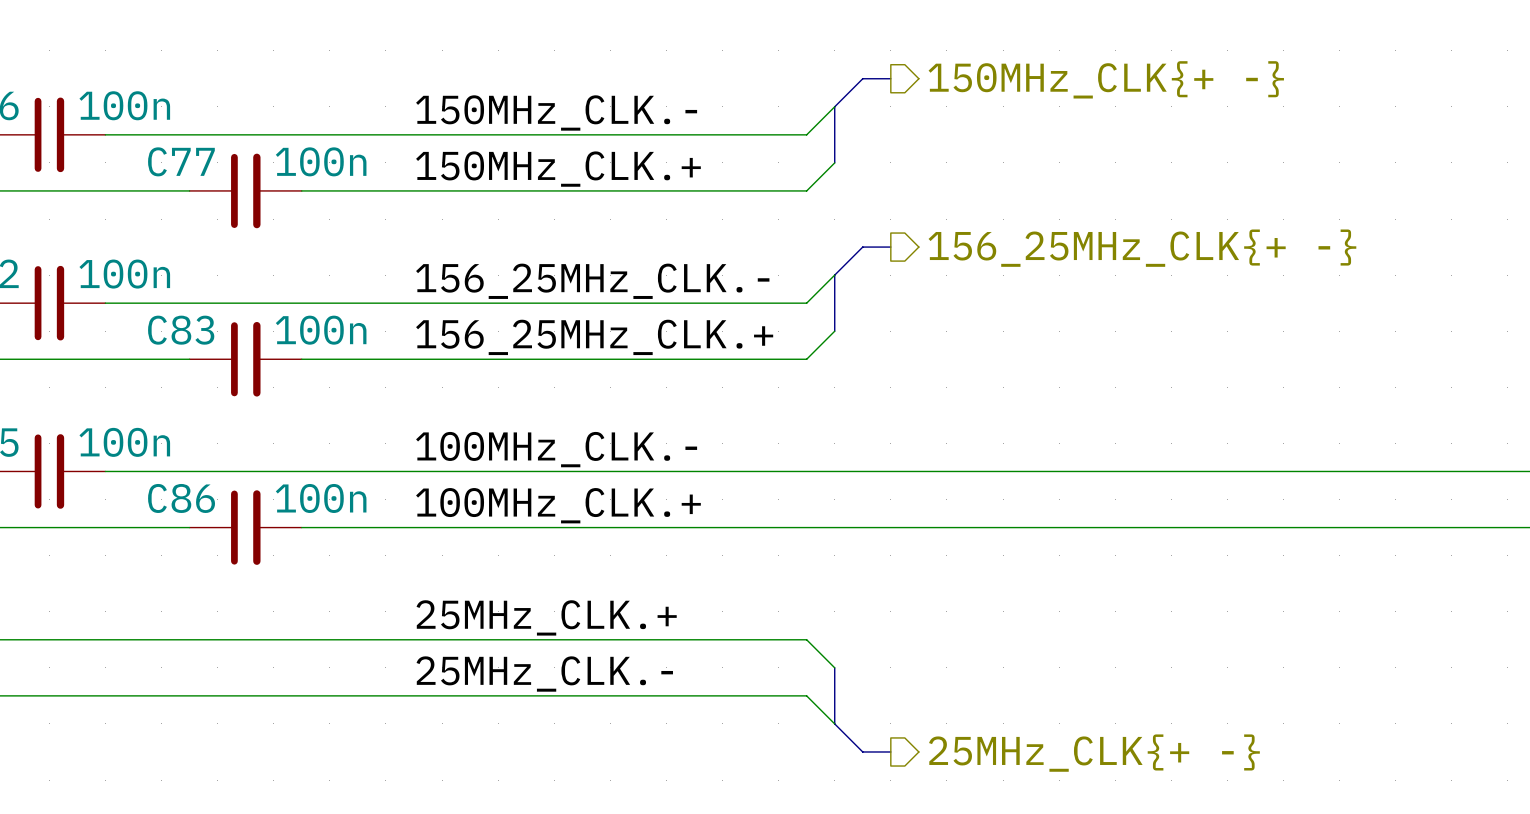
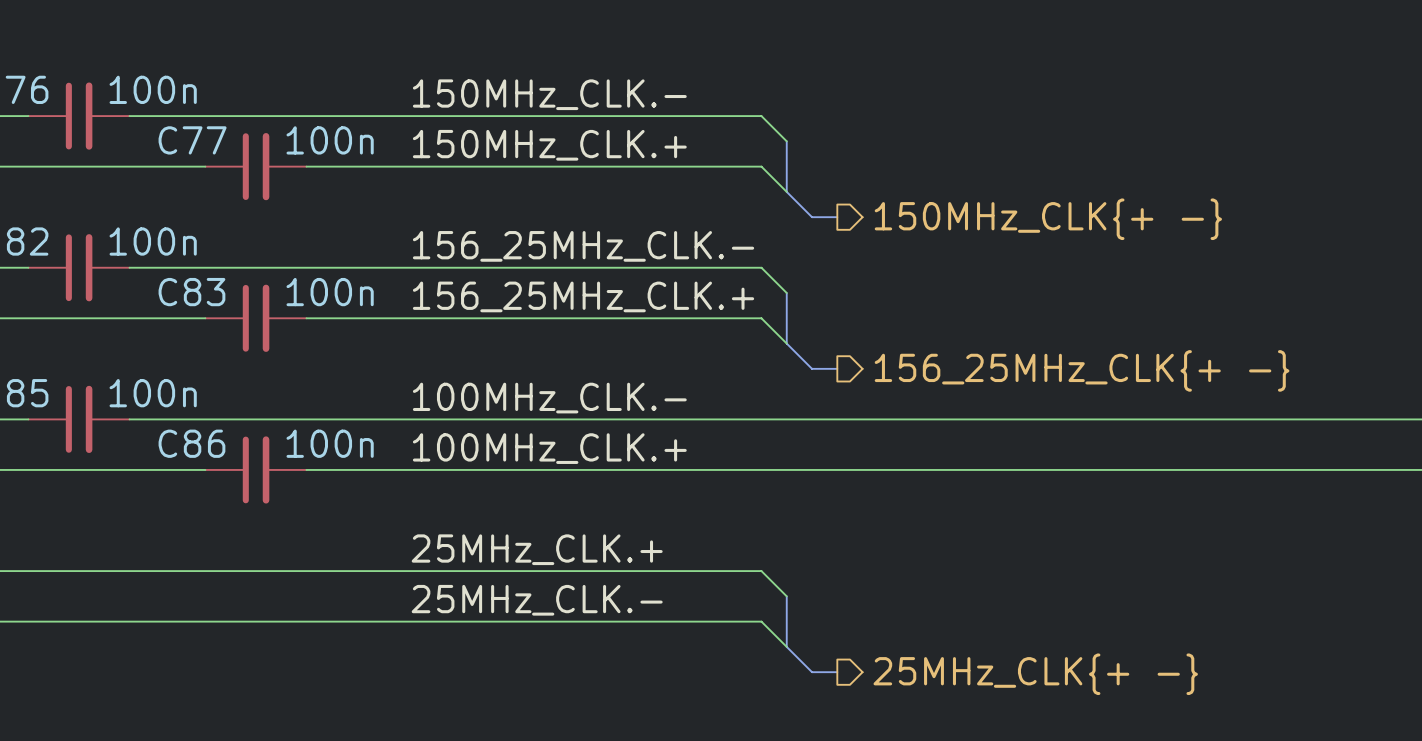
bus: (890, 78) (862, 78) (834, 106) (834, 162) -> none
hierarchical label: 150MHz_CLK{+ -} (1106, 79) -> none
wire: (834, 106) (806, 134) -> (786, 141) (761, 116)
wire: (834, 162) (806, 190) -> (786, 191) (761, 166)
bus: (862, 247) (834, 275) (834, 331) -> (812, 217) (786, 191) (786, 141)
hierarchical label: 156_25MHz_CLK{+ -} (1142, 248) -> 150MHz_CLK{+ -} (1048, 219)
wire: (834, 275) (806, 303) -> (786, 293) (761, 267)
wire: (834, 331) (806, 359) -> (786, 343) (761, 318)
bus: none -> (786, 293) (786, 343) (812, 368) (837, 368)
hierarchical label: none -> 156_25MHz_CLK{+ -} (1082, 370)

